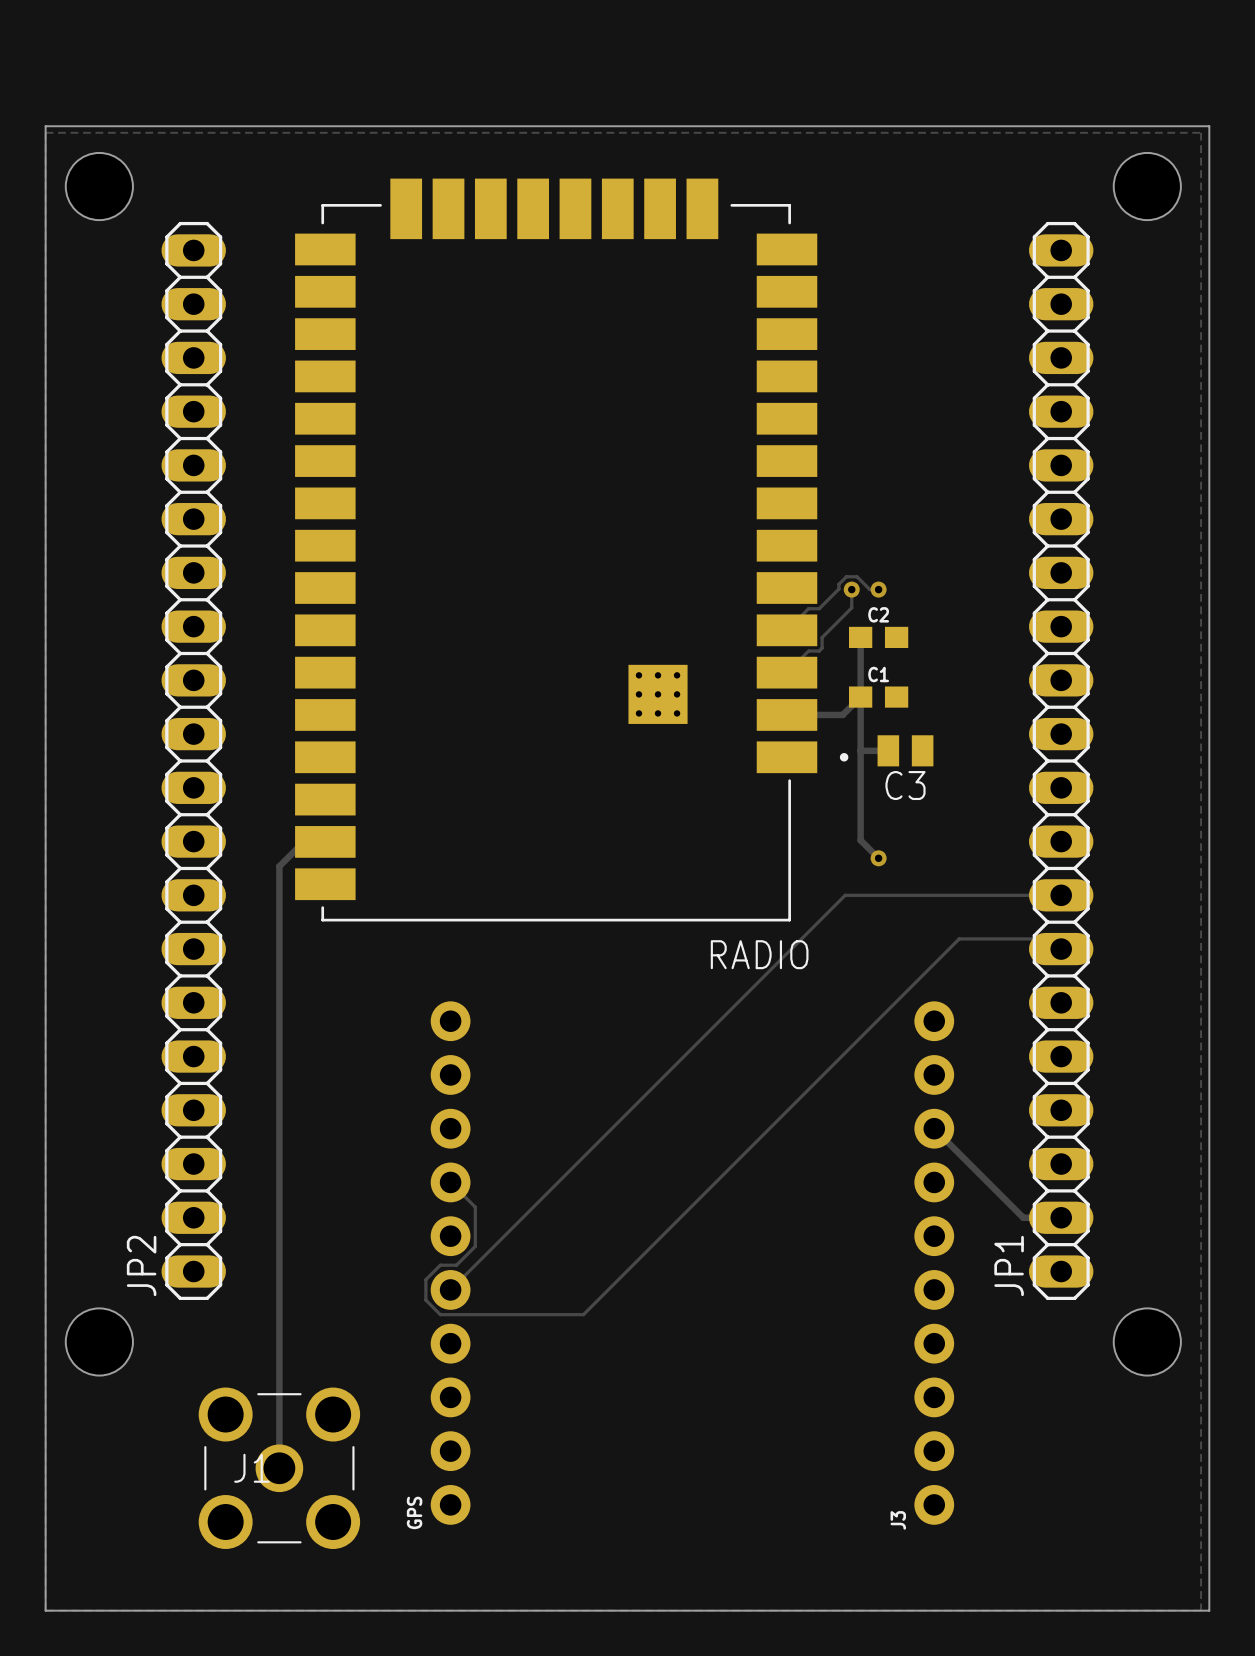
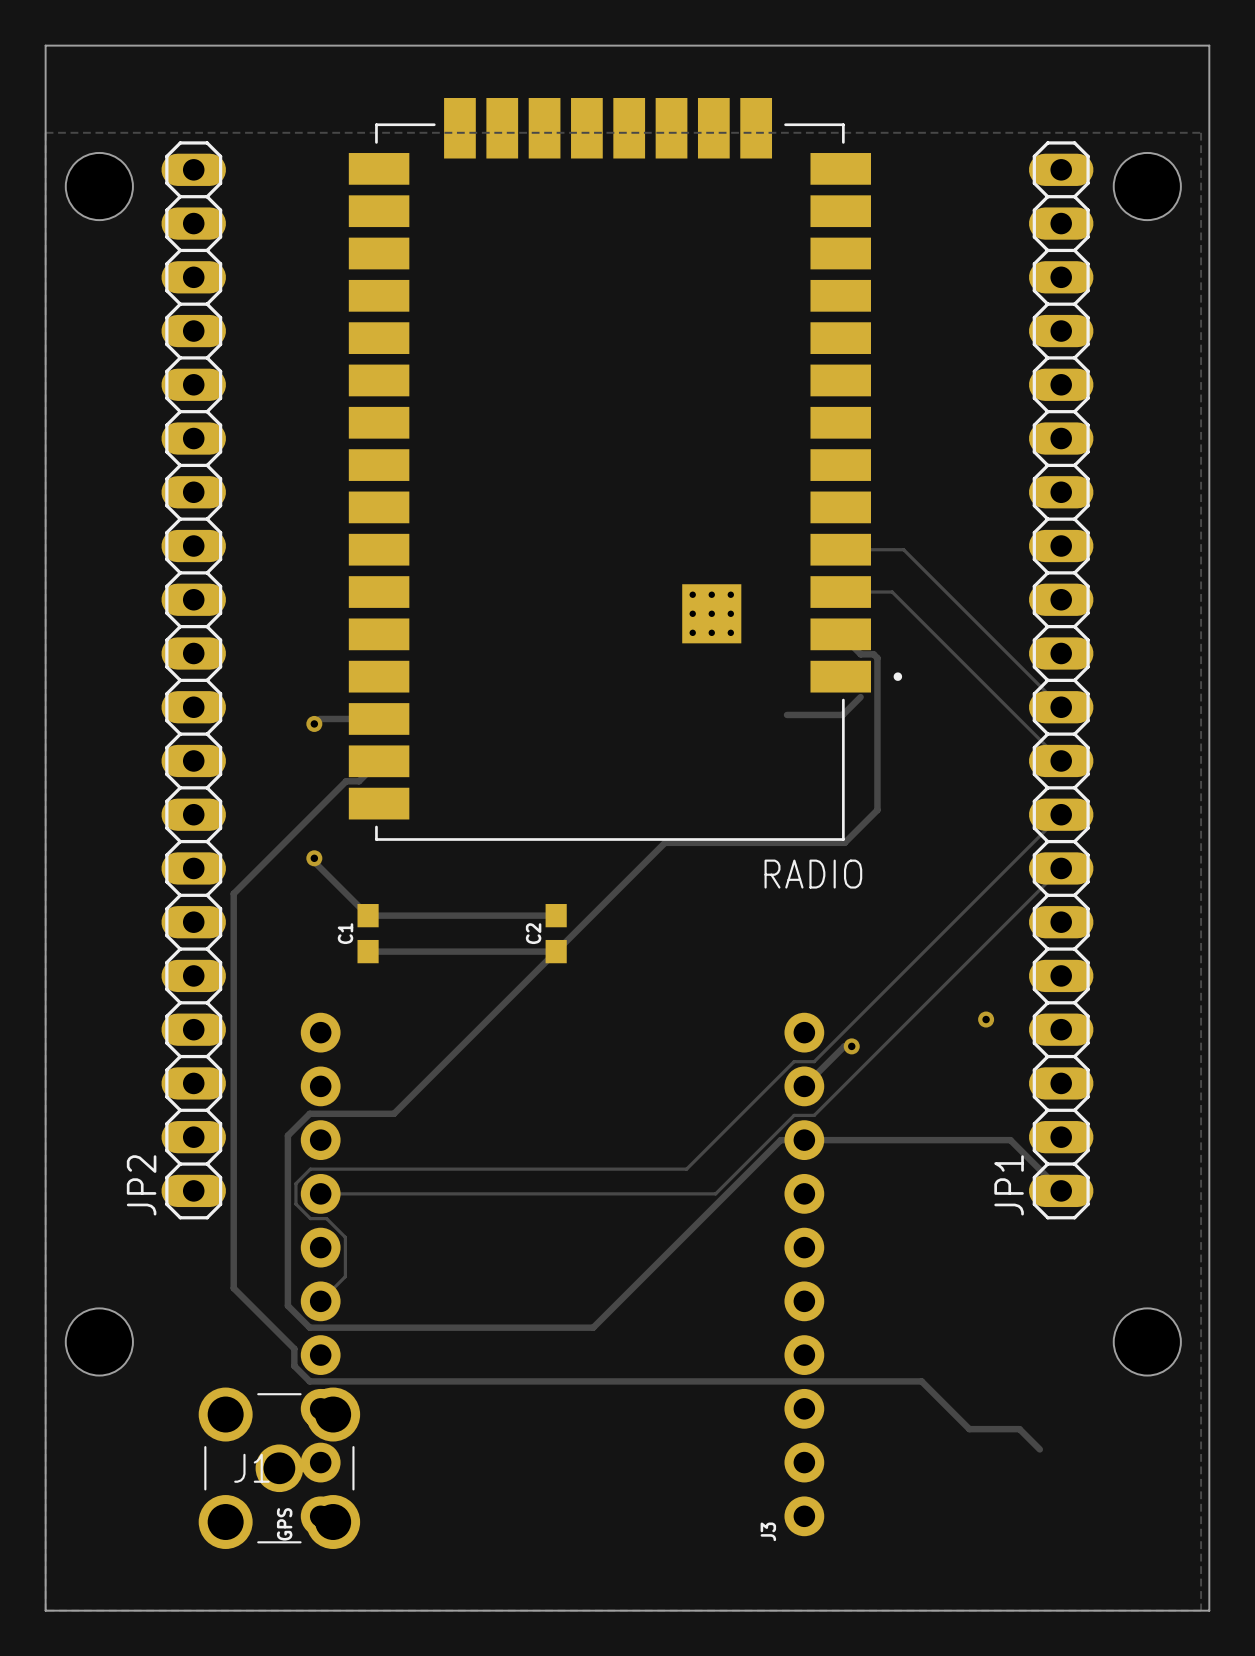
board edge: (45, 126) (1209, 126) -> (45, 126) (45, 45) (1209, 45) (1209, 126)
track: none -> (840, 549) (903, 549) (1061, 707)
RADIO position: (571, 550) -> (625, 469)
track: (851, 589) (851, 607) (822, 637) (822, 648) (819, 651) (808, 651) (787, 672) -> none
via: (851, 589) -> none
track: (878, 589) (869, 589) (857, 576) (846, 576) (838, 584) (838, 589) (819, 608) (808, 608) (787, 630) -> none
via: (878, 589) -> none
track: none -> (840, 592) (892, 592) (1061, 760)
track: none -> (840, 634) (860, 654) (873, 654) (877, 658) (877, 810) (844, 842) (664, 842) (393, 1113) (309, 1113) (287, 1135) (287, 1305) (309, 1327) (593, 1327) (780, 1140) (1010, 1140) (1061, 1190)
track: (860, 637) (860, 840) (878, 858) -> none
C2 rotation: 0° (878, 637) -> 90° clockwise (556, 933)
C2 position: (878, 637) -> (556, 933)
C1 rotation: 0° (878, 697) -> 90° clockwise (368, 933)
C1 position: (878, 697) -> (368, 933)
track: none -> (379, 718) (319, 718) (314, 723)
via: none -> (314, 723)
track: (860, 750) (888, 750) -> none
C3: (905, 750) -> none
JP2 position: (193, 760) -> (193, 680)
JP1 position: (1061, 760) -> (1061, 680)
track: none -> (379, 761) (359, 781) (346, 781) (233, 893) (233, 1288) (294, 1348) (294, 1366) (309, 1381) (921, 1381) (969, 1429) (1019, 1429) (1039, 1449)
track: none -> (1061, 814) (814, 1061) (794, 1061) (686, 1169) (310, 1169) (295, 1183) (295, 1204) (310, 1218) (326, 1218) (345, 1237) (345, 1276) (320, 1301)
track: (314, 831) (279, 866) (279, 1468) -> none
track: none -> (314, 858) (314, 861) (368, 915) (556, 915)
via: none -> (314, 858)
via: (878, 858) -> none
track: none -> (1061, 868) (814, 1115) (794, 1115) (715, 1193) (320, 1193)
track: (1061, 895) (845, 895) (450, 1289) -> none
track: (1061, 949) (1051, 938) (959, 938) (583, 1314) (440, 1314) (425, 1300) (425, 1279) (440, 1265) (456, 1265) (475, 1246) (475, 1207) (450, 1182) -> none
track: none -> (368, 951) (556, 951)
via: none -> (986, 1019)
track: none -> (851, 1046) (844, 1046) (804, 1086)
via: none -> (851, 1046)
track: (934, 1128) (1023, 1217) (1061, 1217) -> none
GPS position: (450, 1263) -> (320, 1274)
J3 position: (934, 1263) -> (804, 1274)

